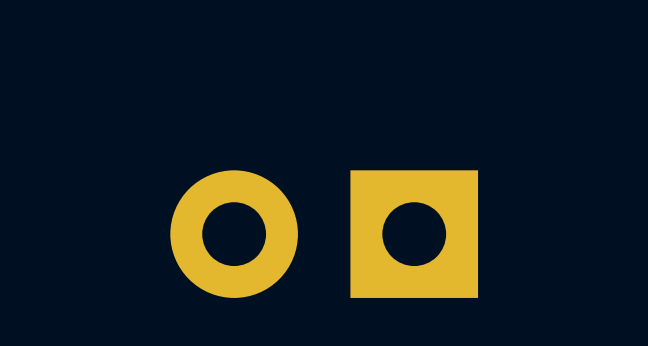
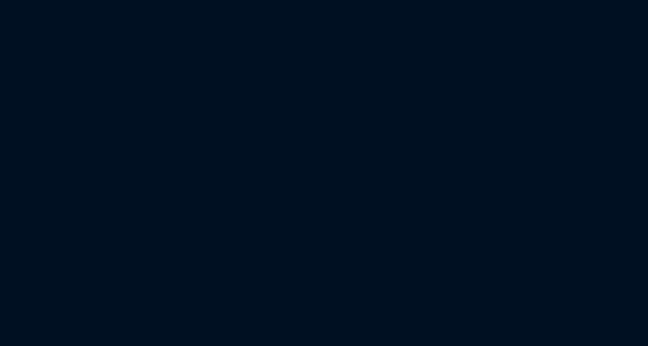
part: (324, 234) -> none

